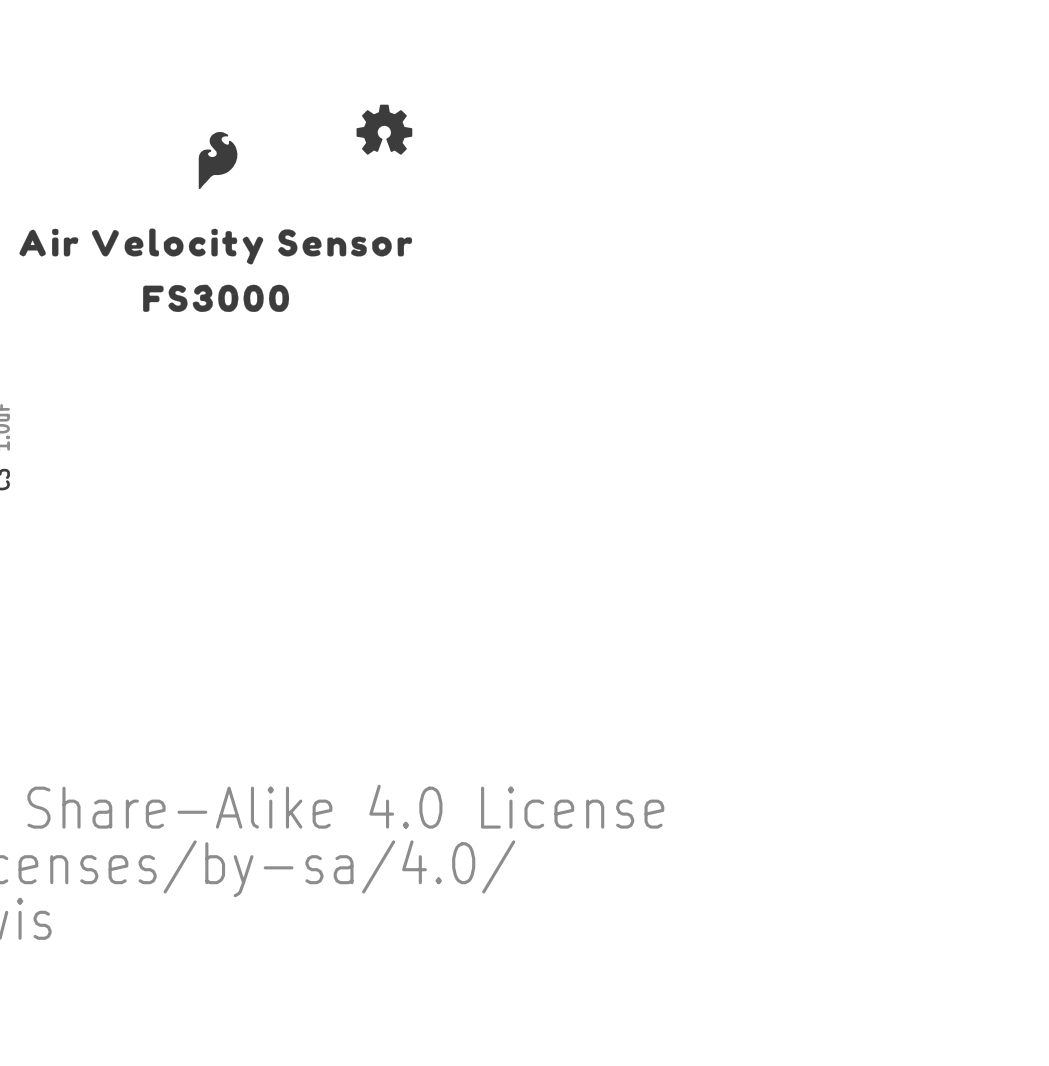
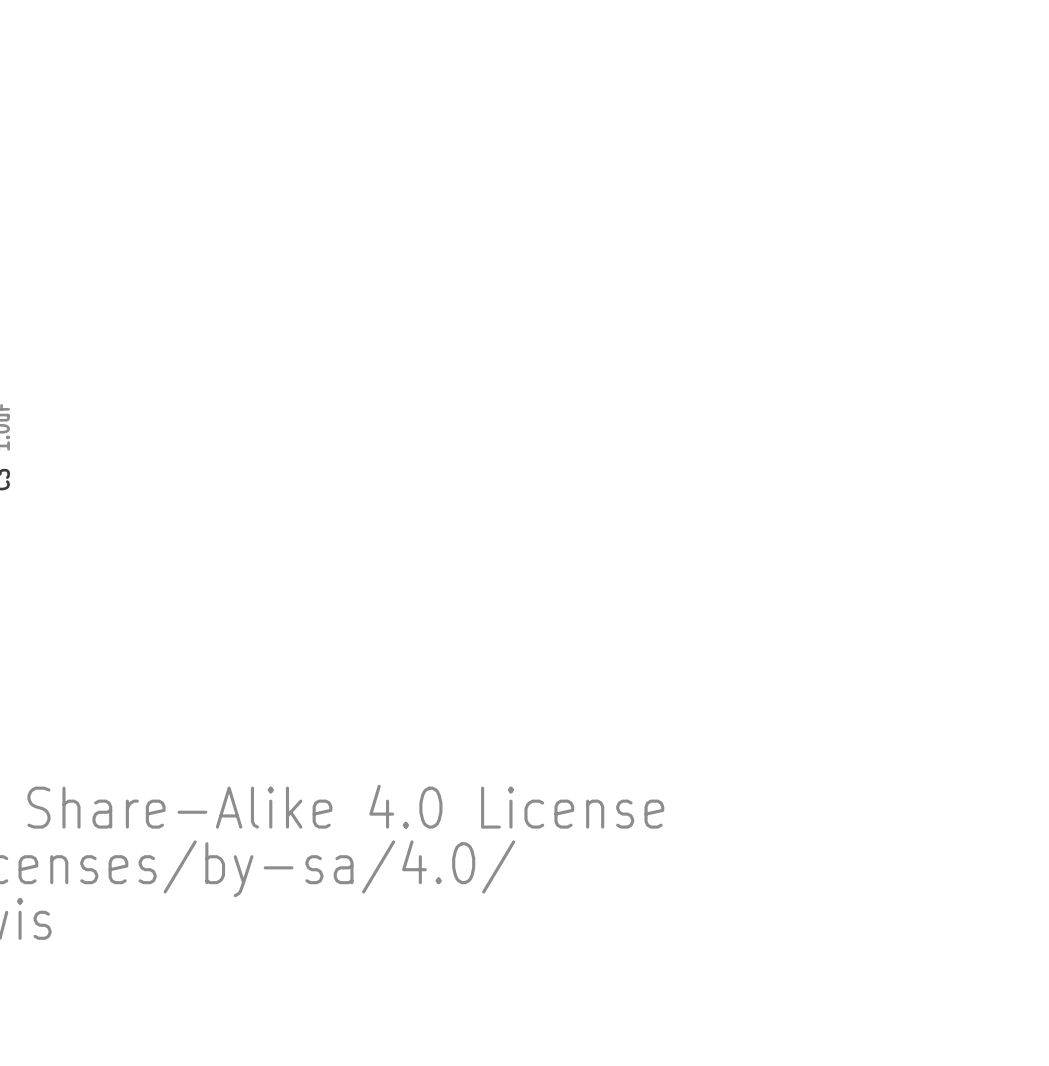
drawing: [356, 104, 413, 155] -> none
drawing: [198, 132, 238, 190] -> none
drawing: [19, 228, 413, 312] -> none

